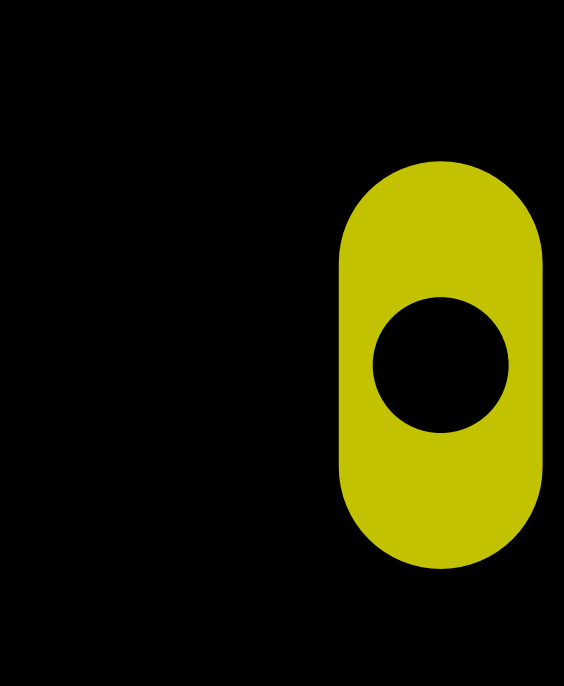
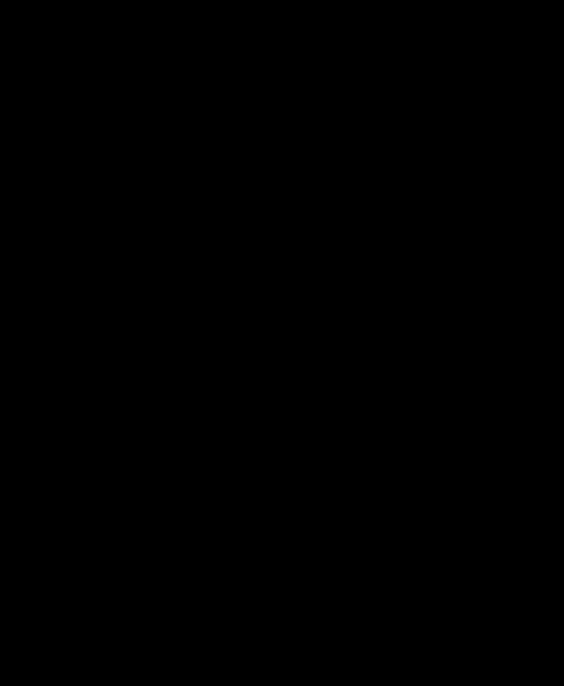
part: (440, 365) -> none

